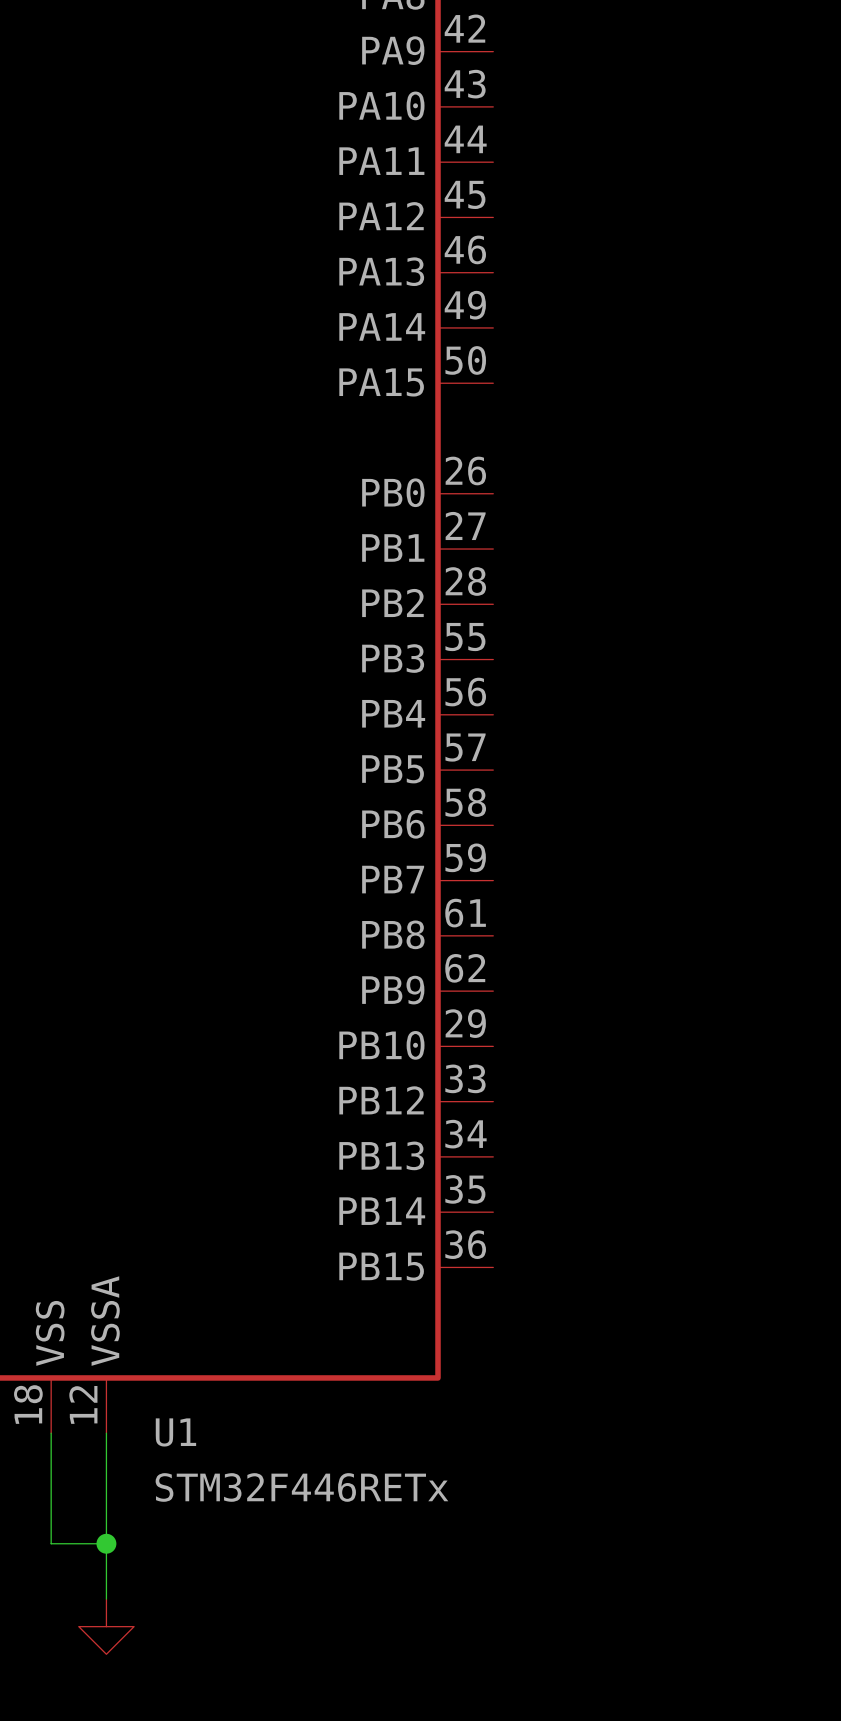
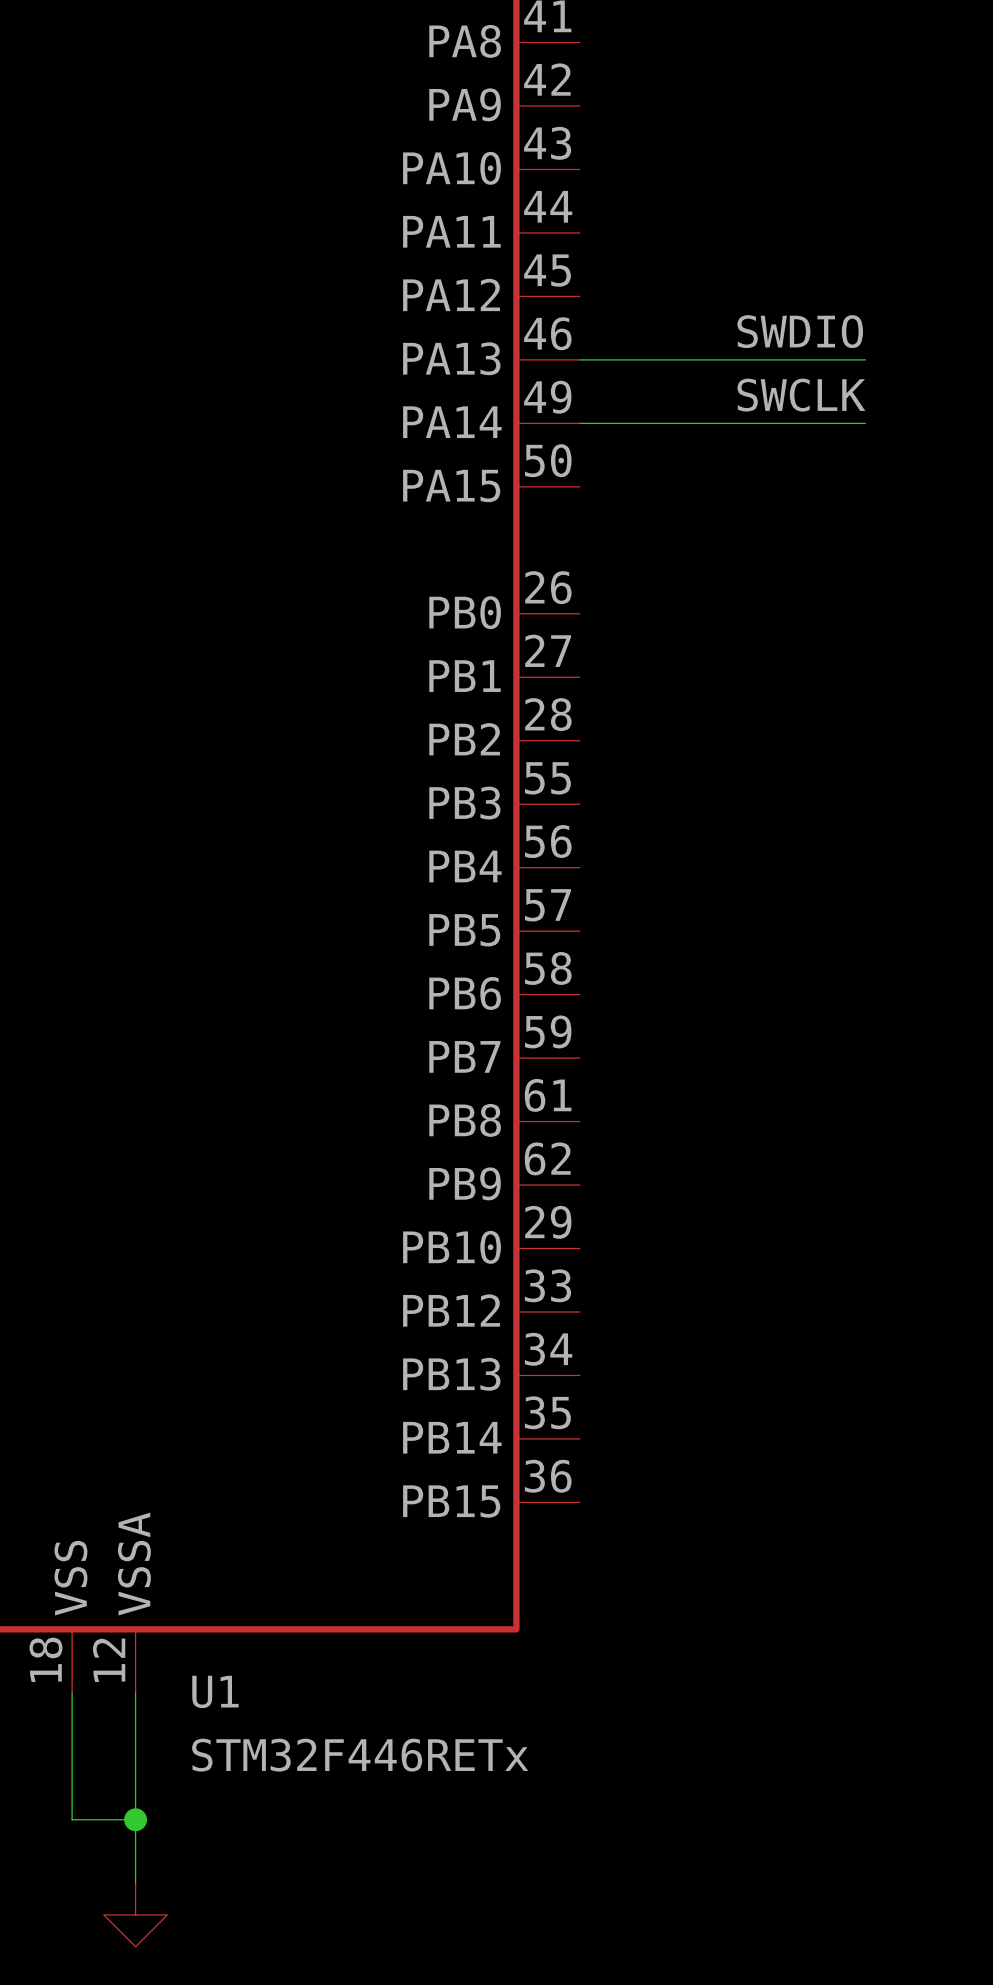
label: none -> SWDIO (800, 331)
wire: none -> (579, 359) (865, 359)
label: none -> SWCLK (801, 395)
wire: none -> (579, 423) (865, 423)

